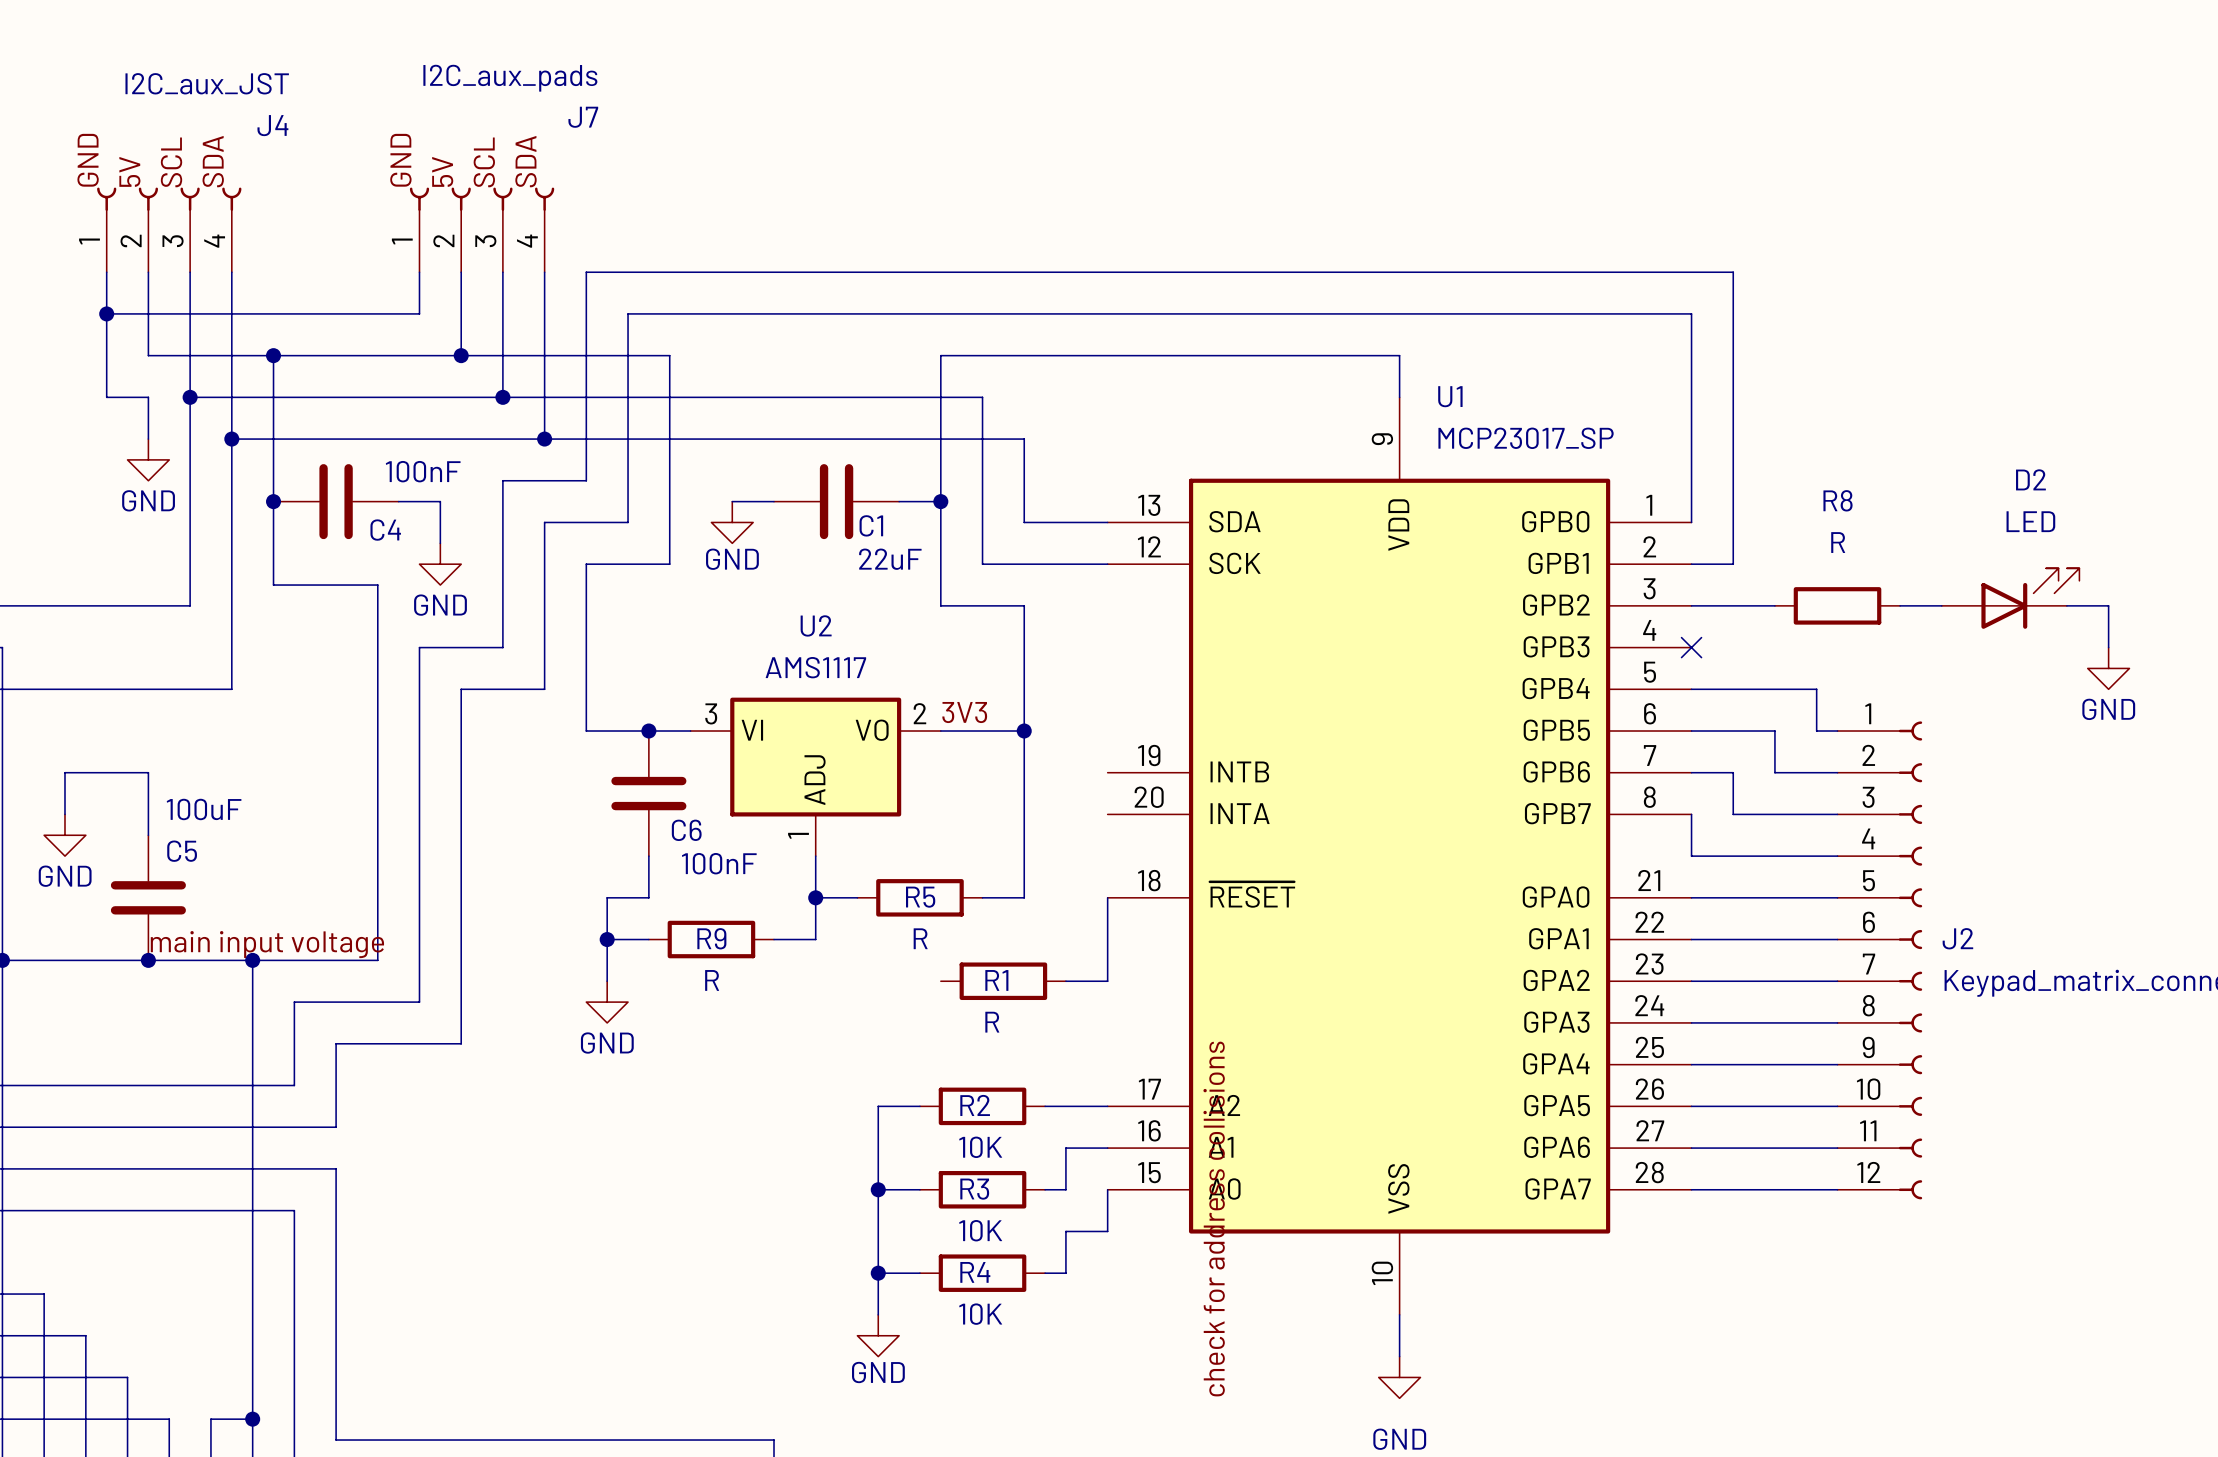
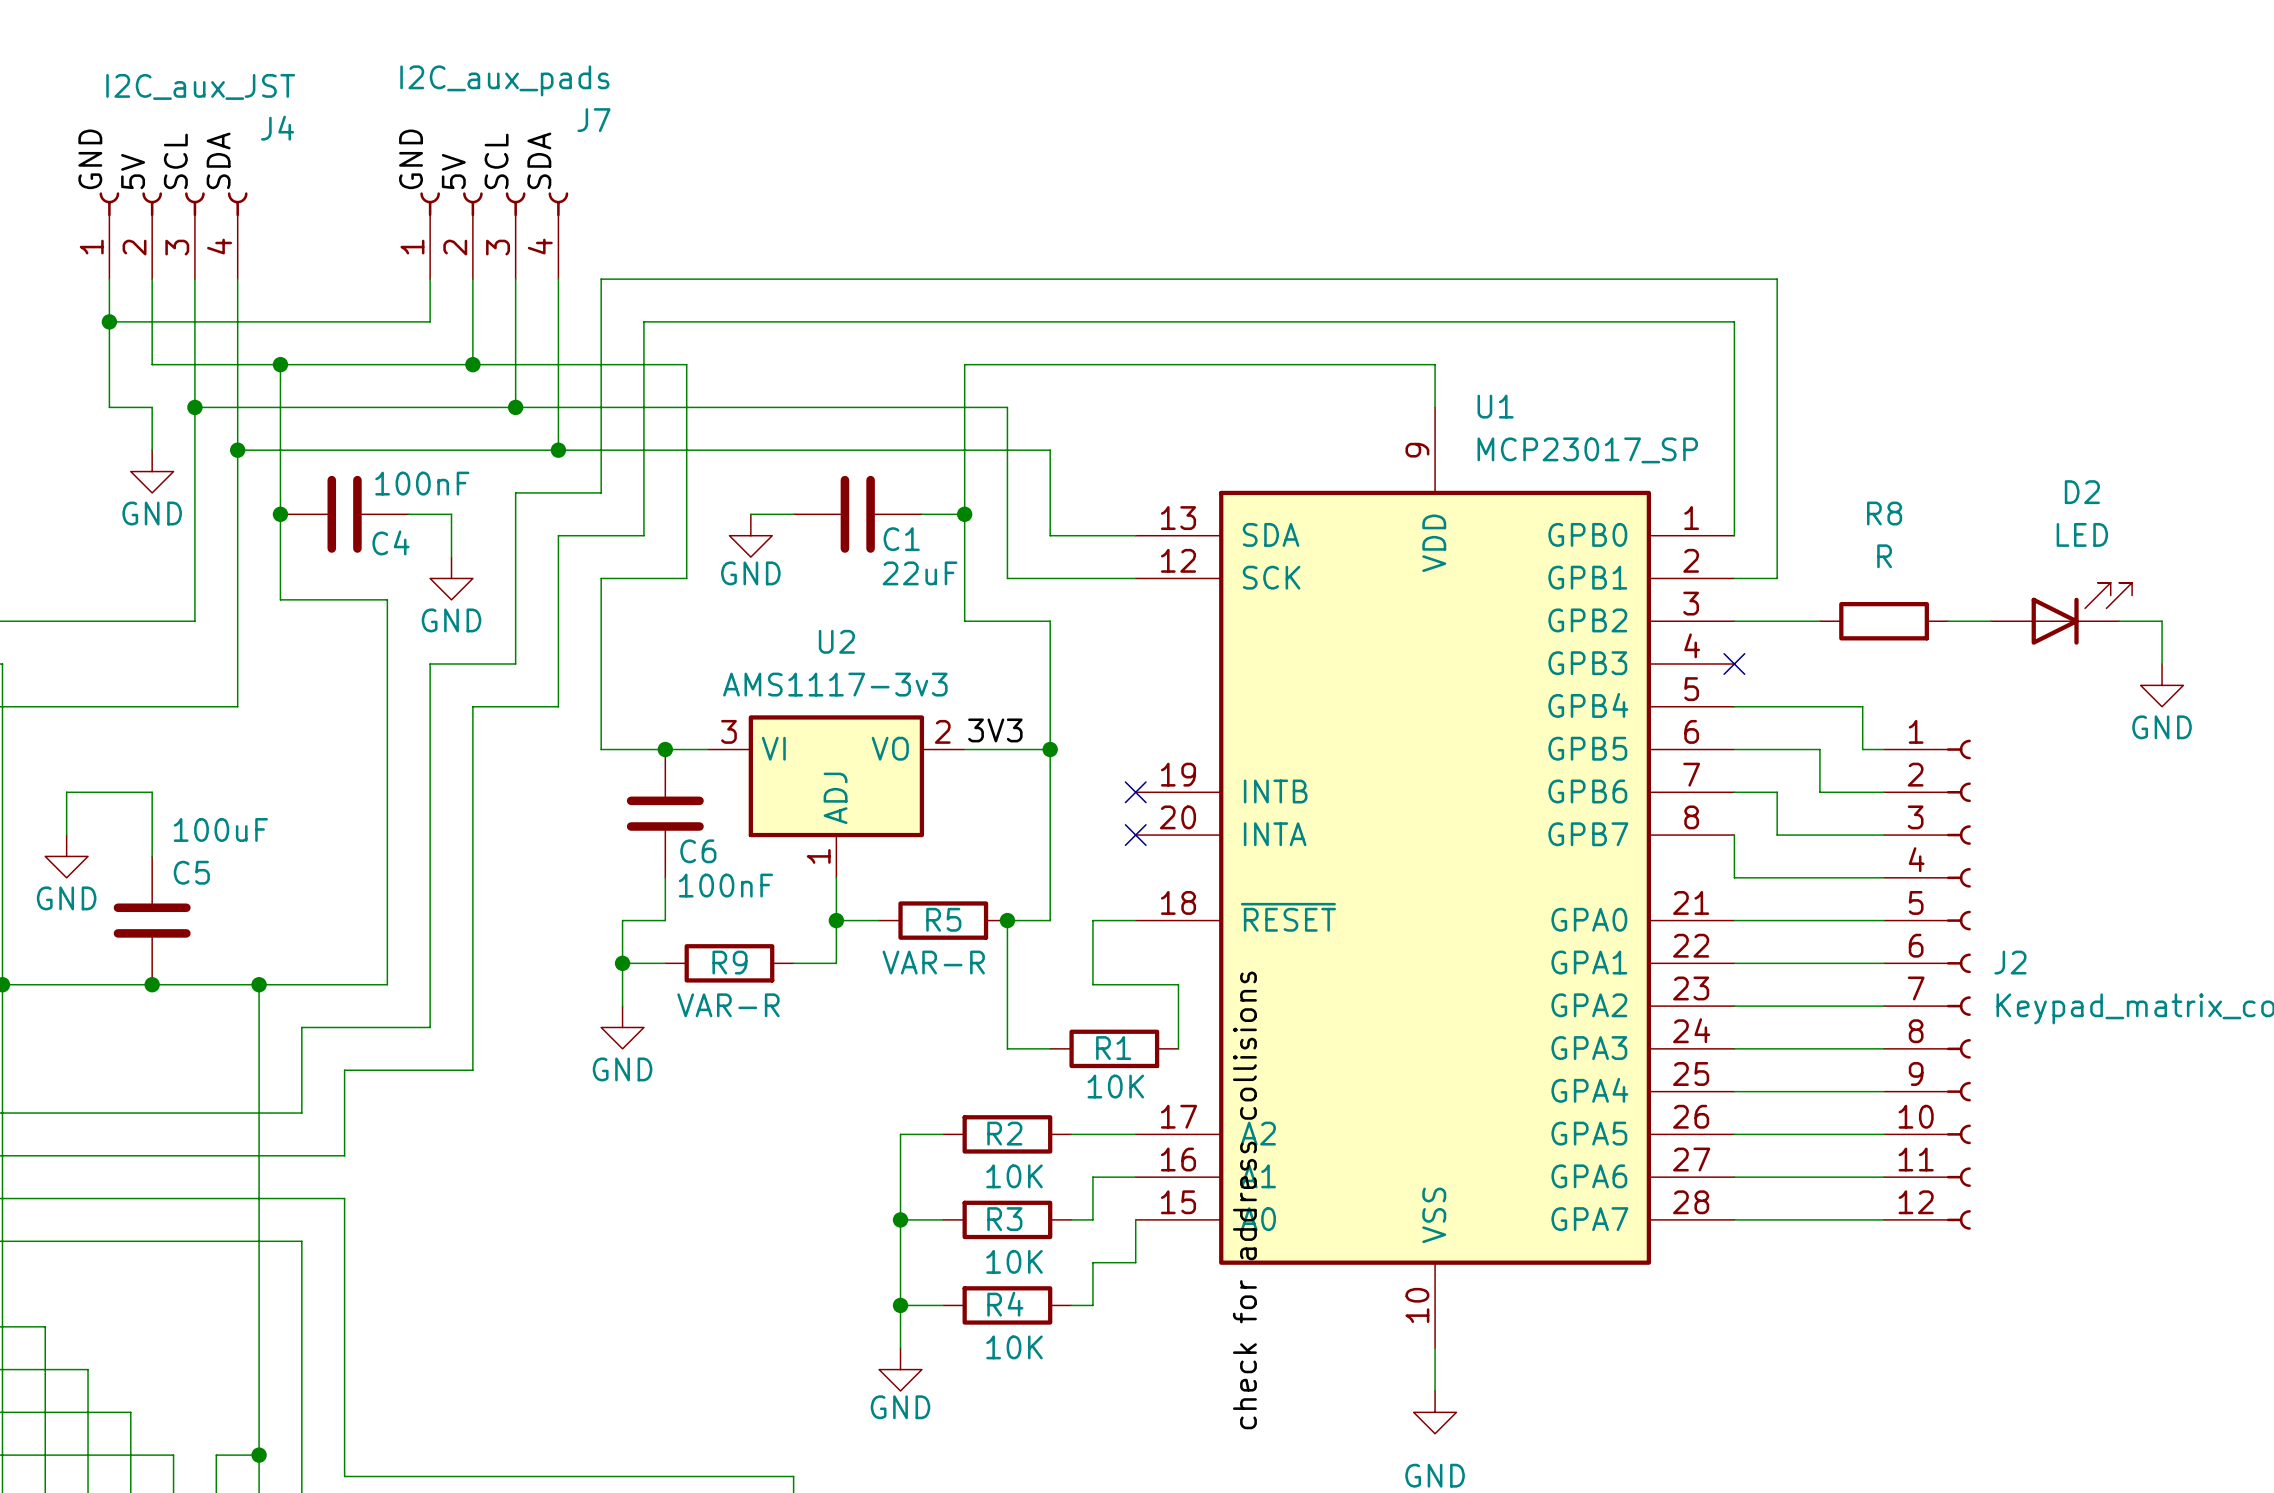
U2 value: AMS1117 (815, 667) -> AMS1117-3v3 (835, 684)
no-connect mark: none -> (1135, 792)
no-connect mark: none -> (1135, 835)
wire: none -> (1007, 920) (1007, 1048) (1050, 1048)
junction: none -> (1007, 920)
wire: (1107, 897) (1107, 981) (1065, 981) -> (1135, 920) (1092, 920) (1092, 984) (1178, 984) (1178, 1048)
R5 value: R (920, 938) -> VAR-R (933, 962)
label: main input voltage (267, 944) -> none
R9 value: R (712, 980) -> VAR-R (728, 1005)
R1 name position: R1 (996, 980) -> R1 (1113, 1048)
R1 position: (1003, 981) -> (1114, 1048)
R1 value: R (992, 1022) -> 10K (1115, 1086)

